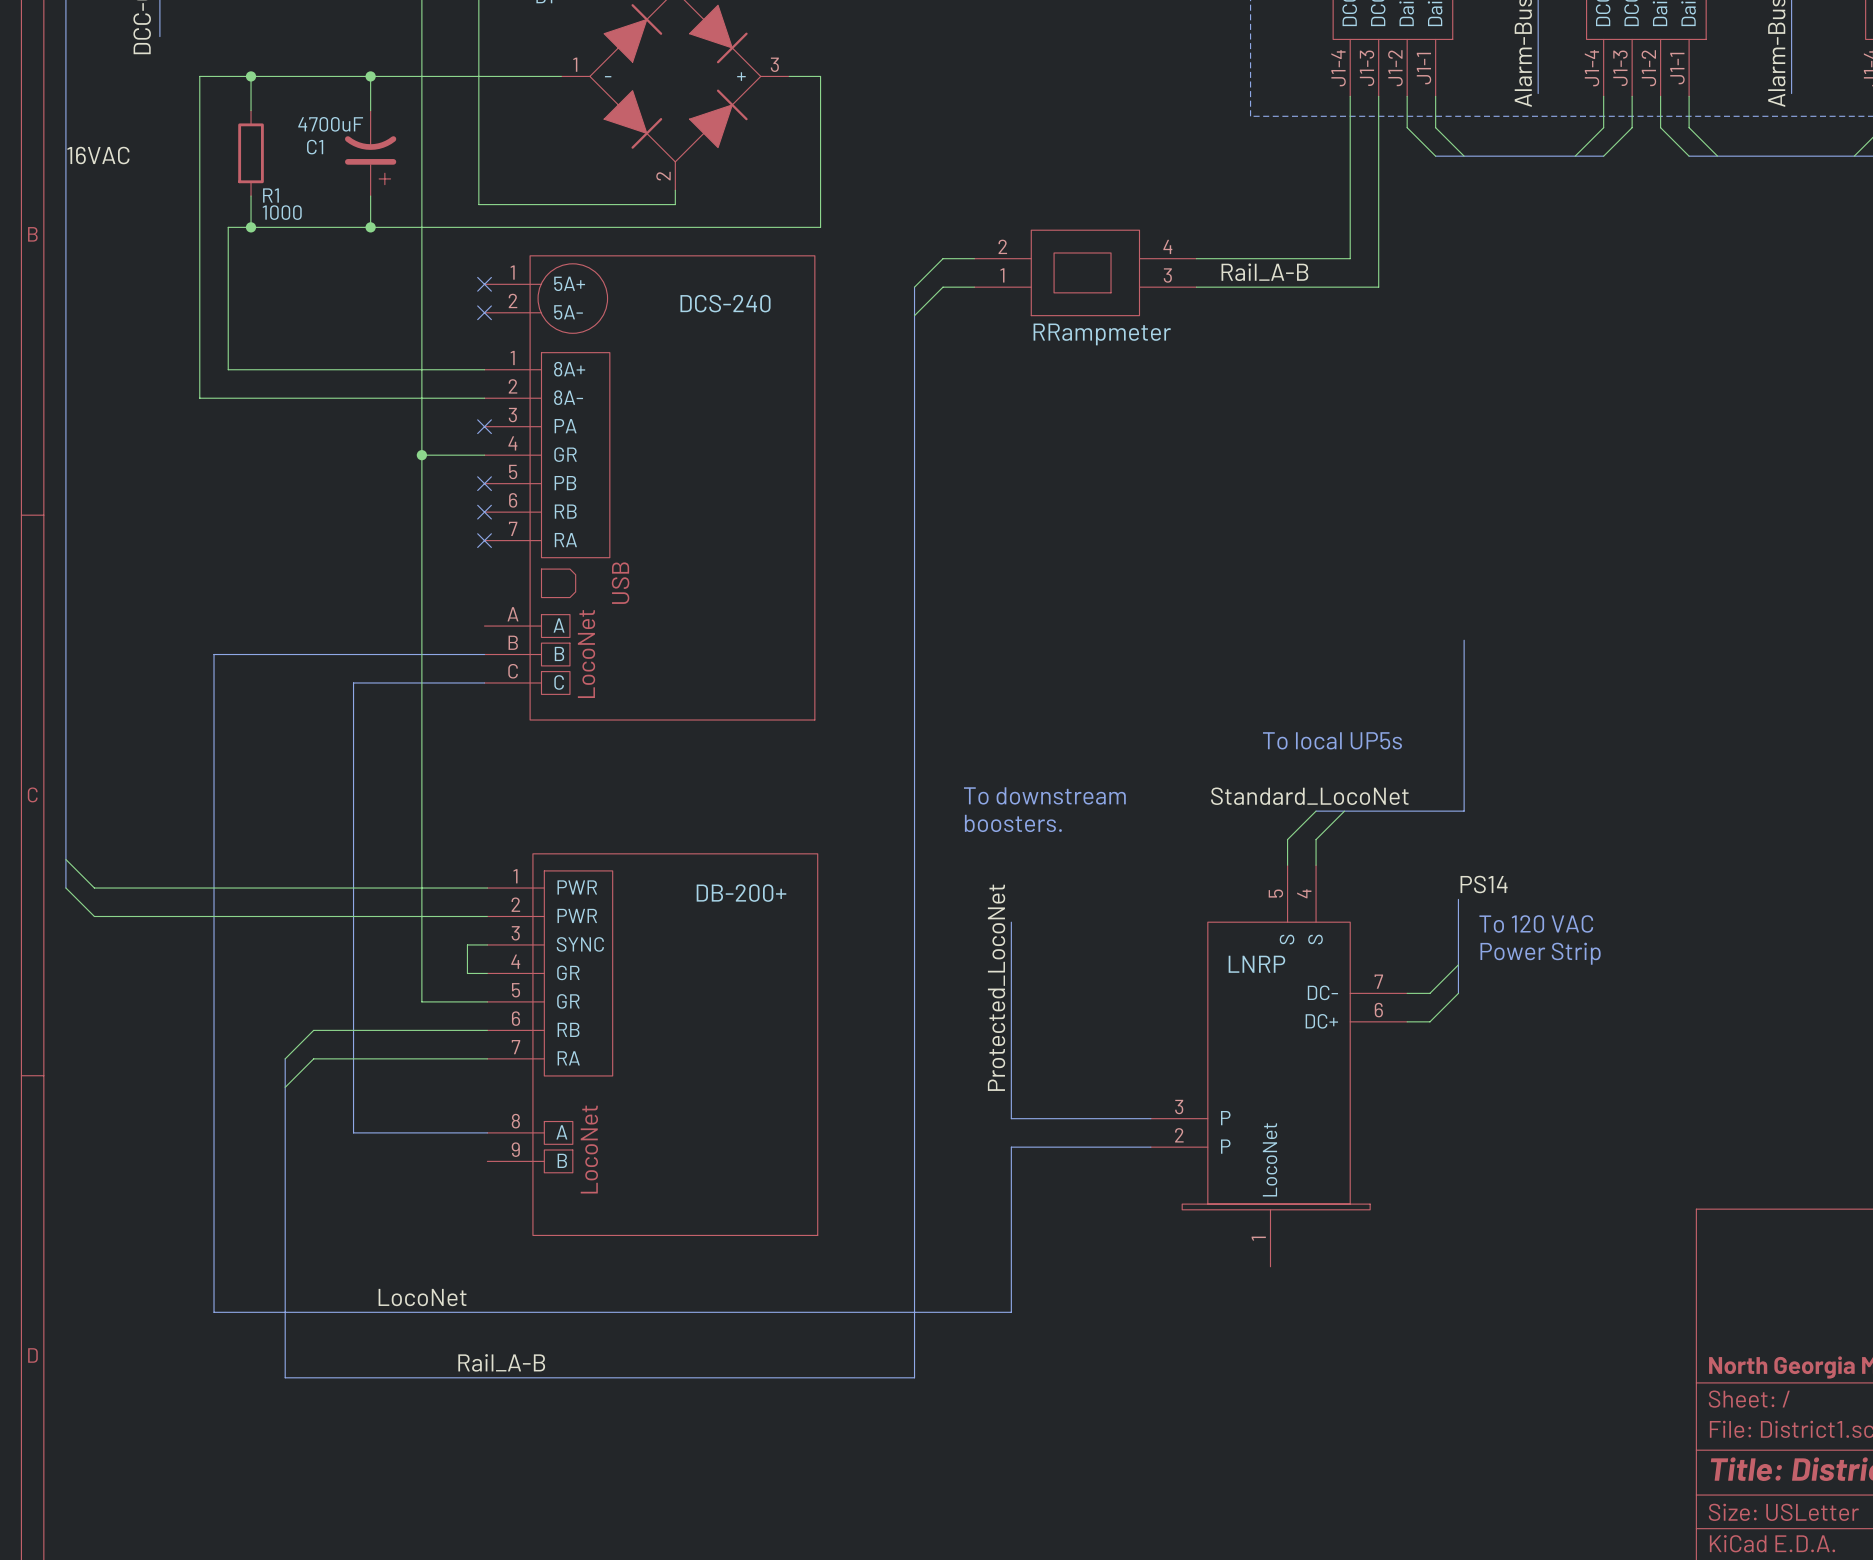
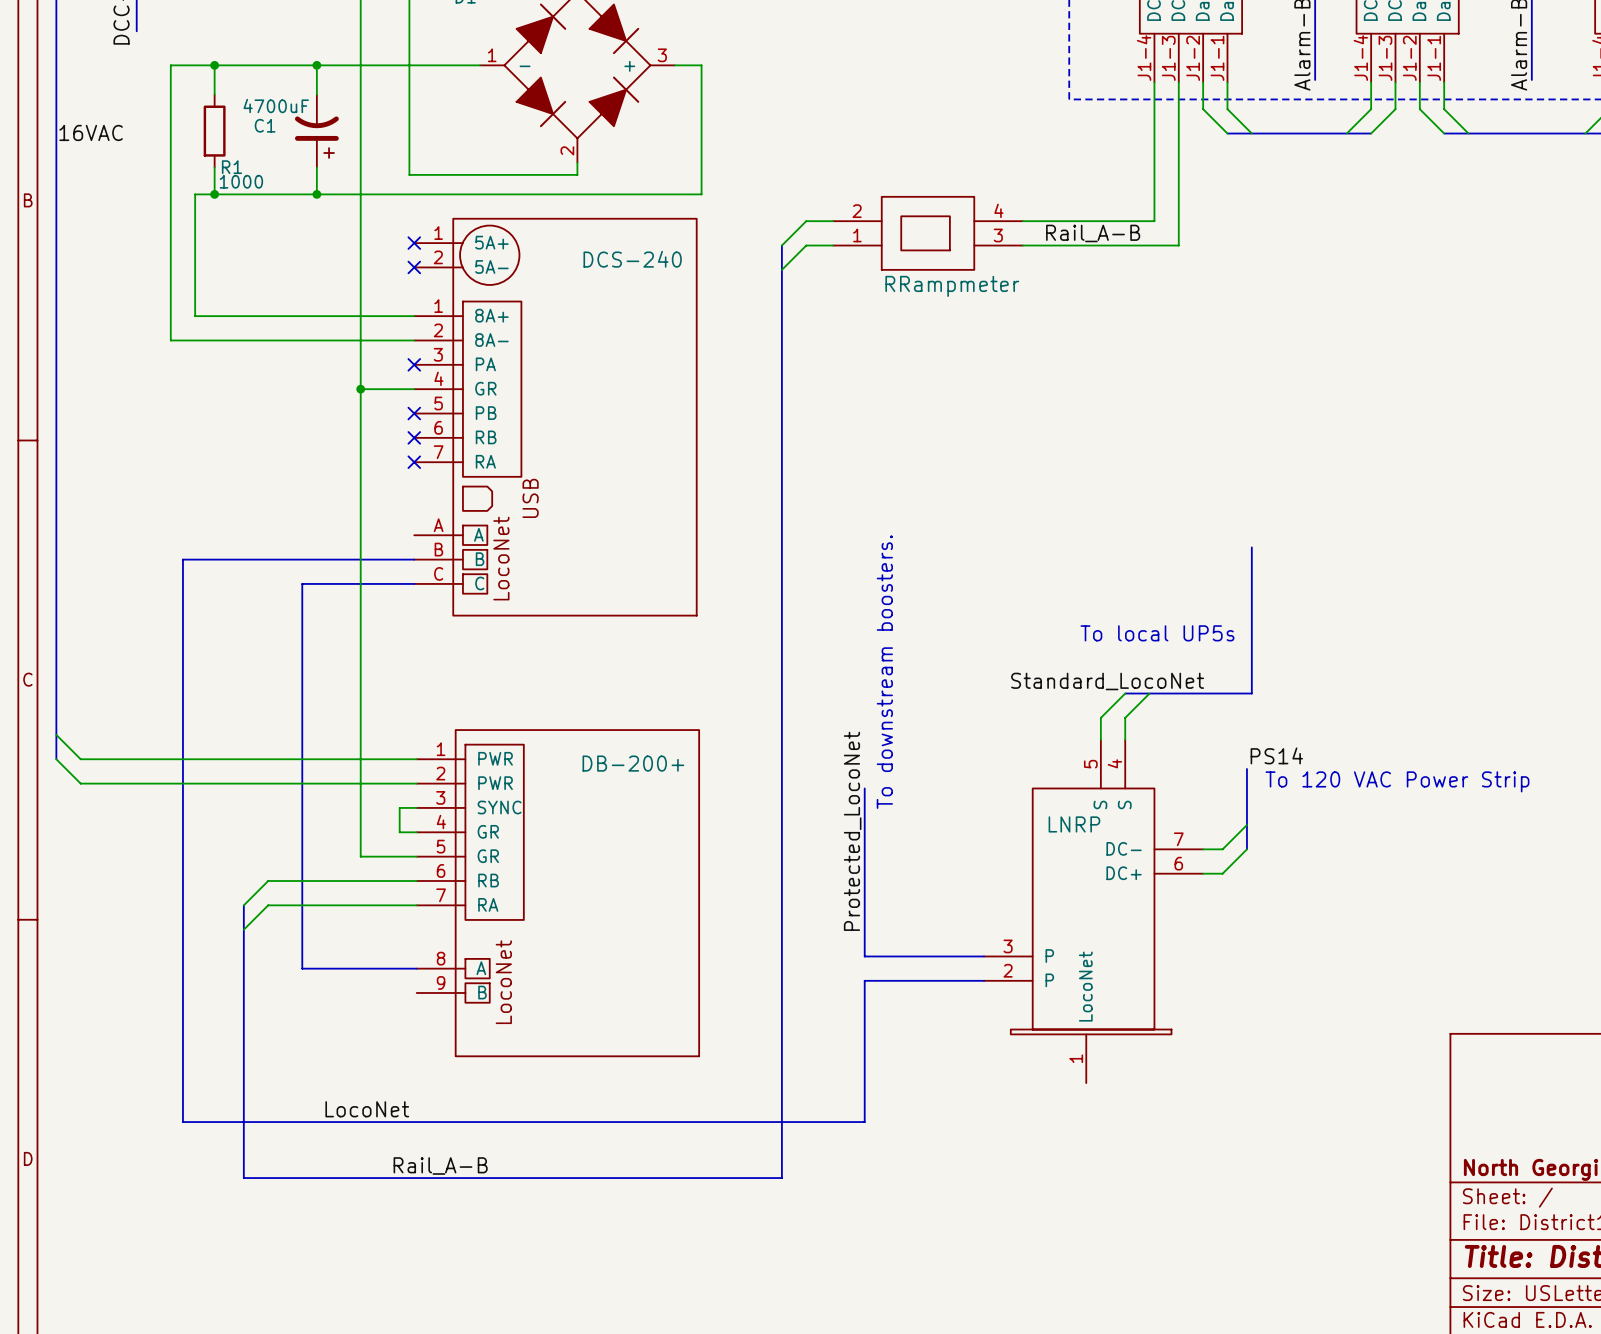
text: To downstream (1044, 795) -> To downstream boosters. (884, 672)
text: boosters. (1013, 823) -> none
text: To 120 VAC (1536, 923) -> To 120 VAC Power Strip (1397, 781)
text: Power Strip (1540, 953) -> none

